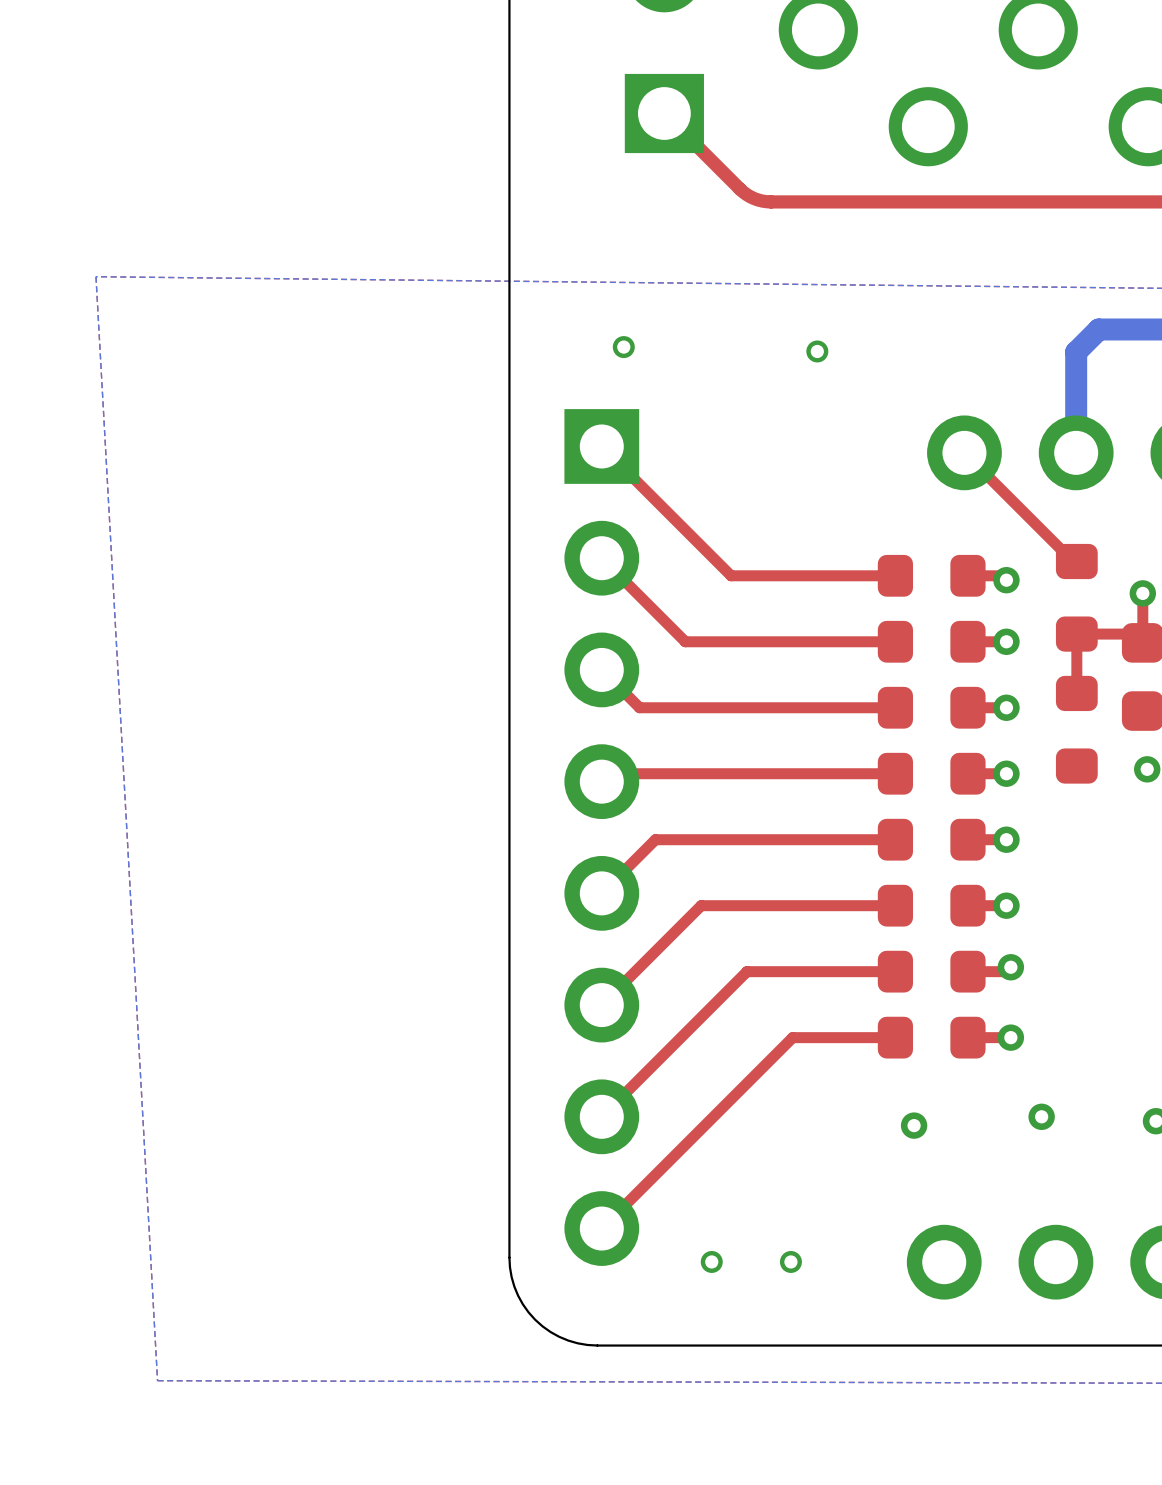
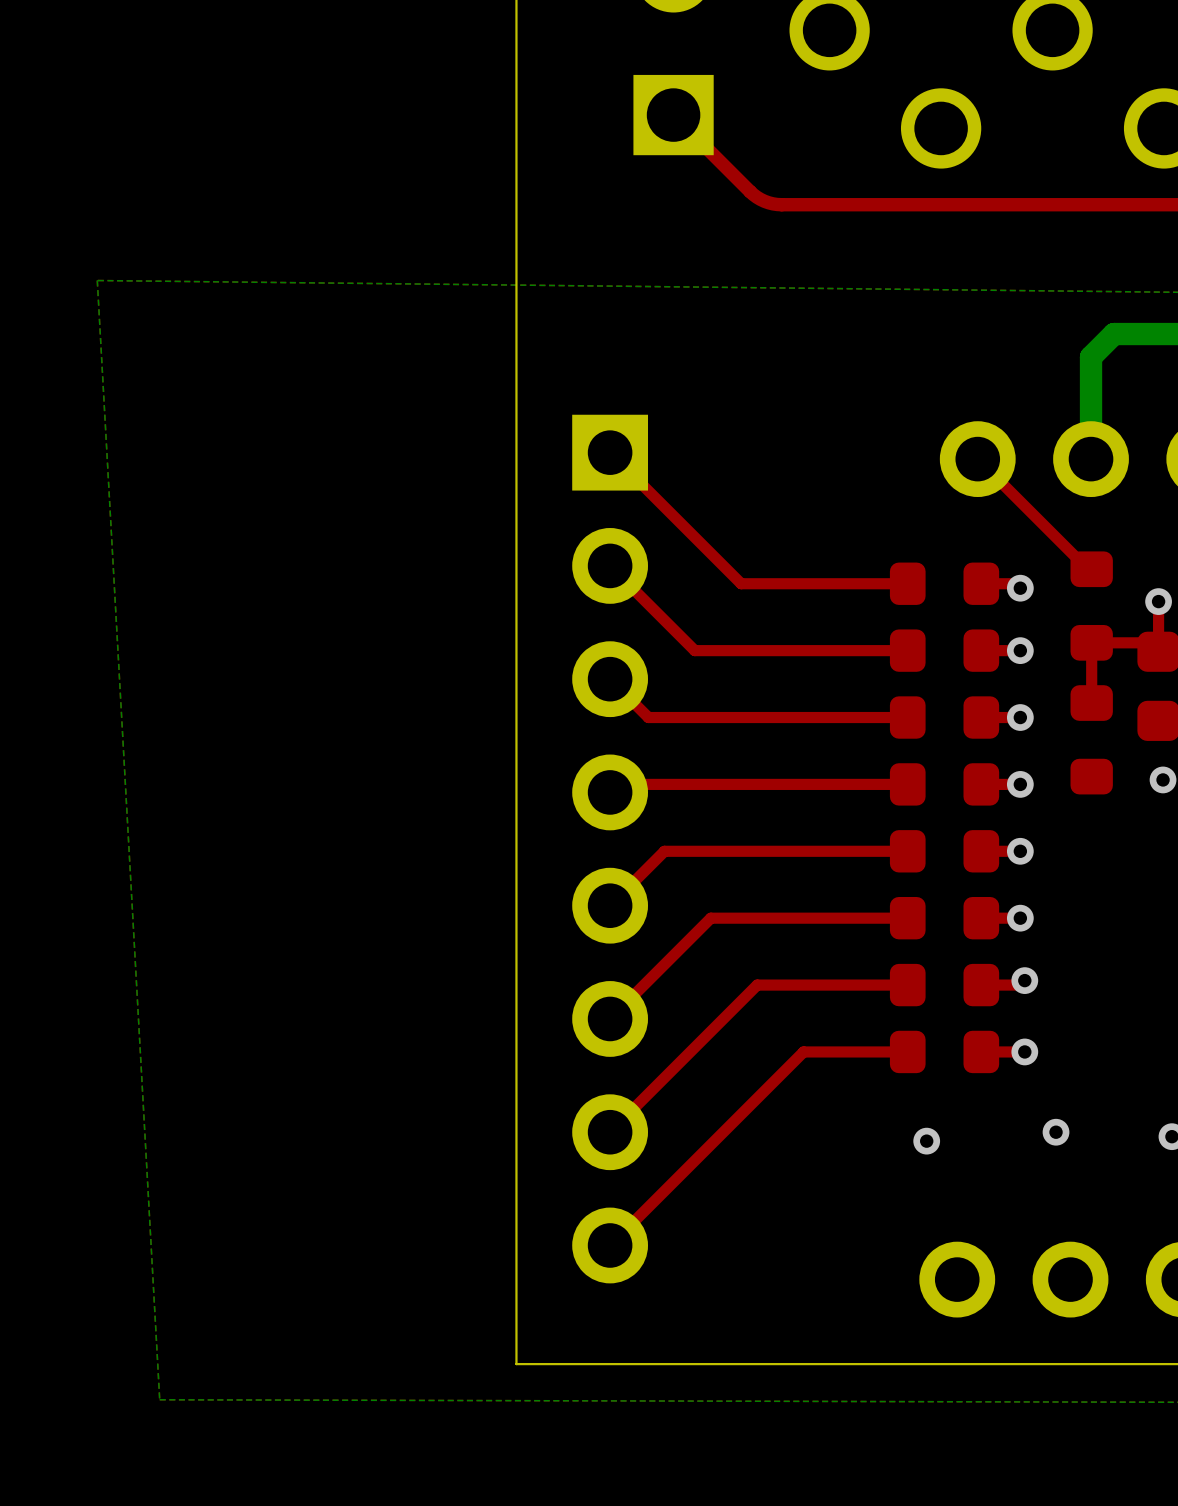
via: (623, 347) -> none
via: (817, 351) -> none
board edge: (509, 1257) (514, 1286) (522, 1304) (535, 1319) (559, 1336) (577, 1343) (597, 1345) -> (516, 1274) (516, 1364) (605, 1364)
via: (711, 1261) -> none
via: (790, 1261) -> none

